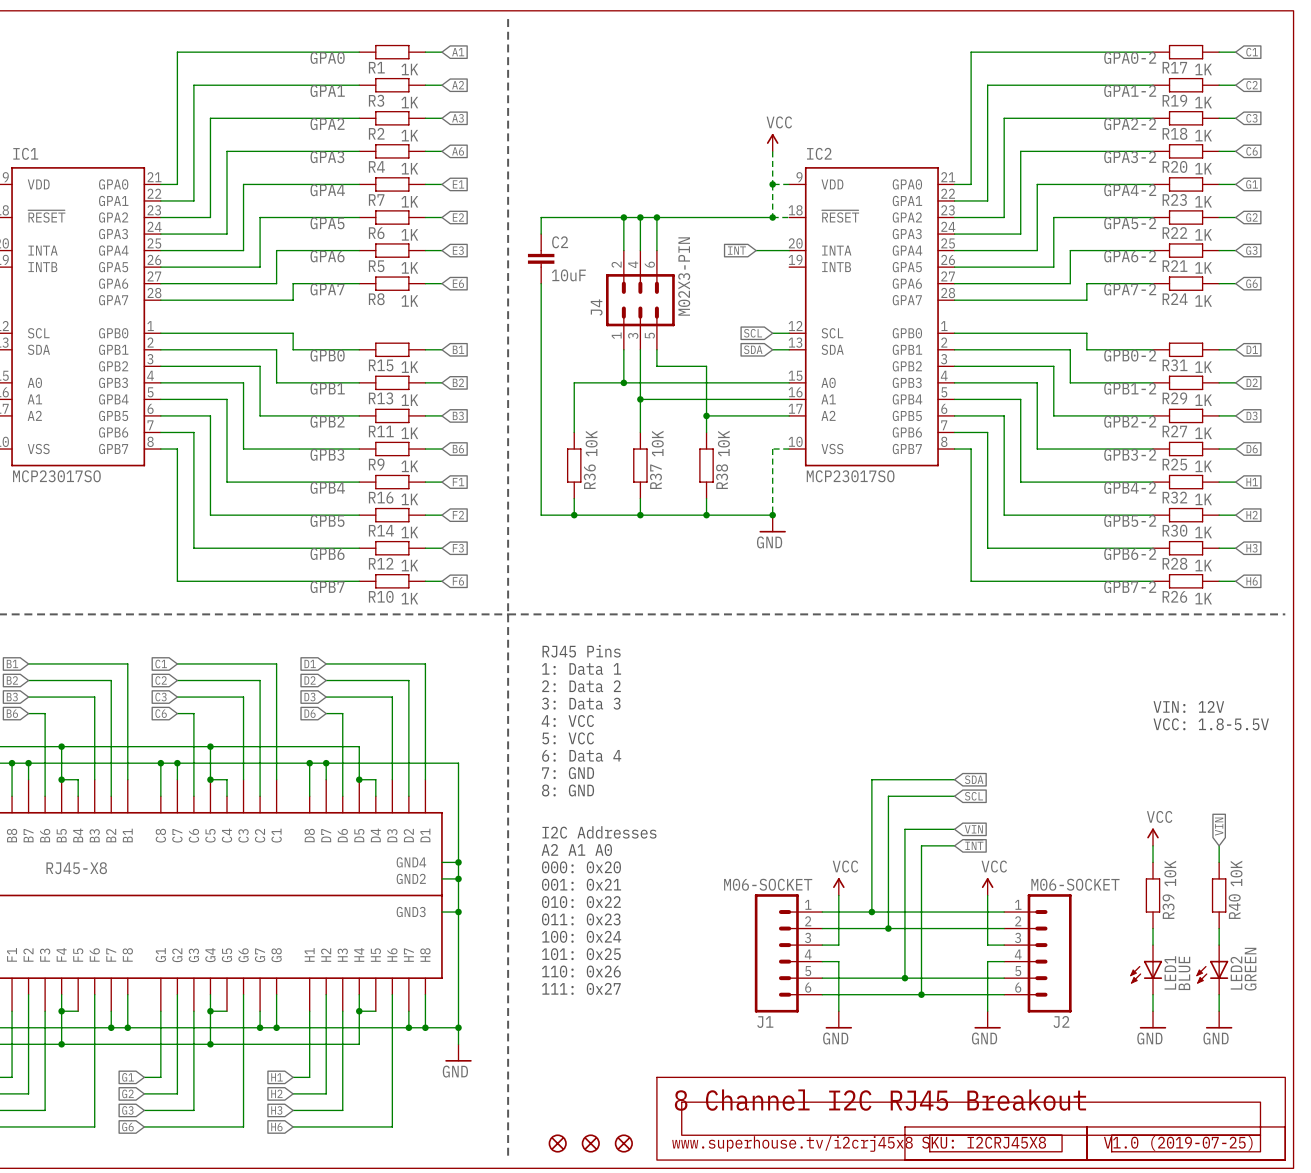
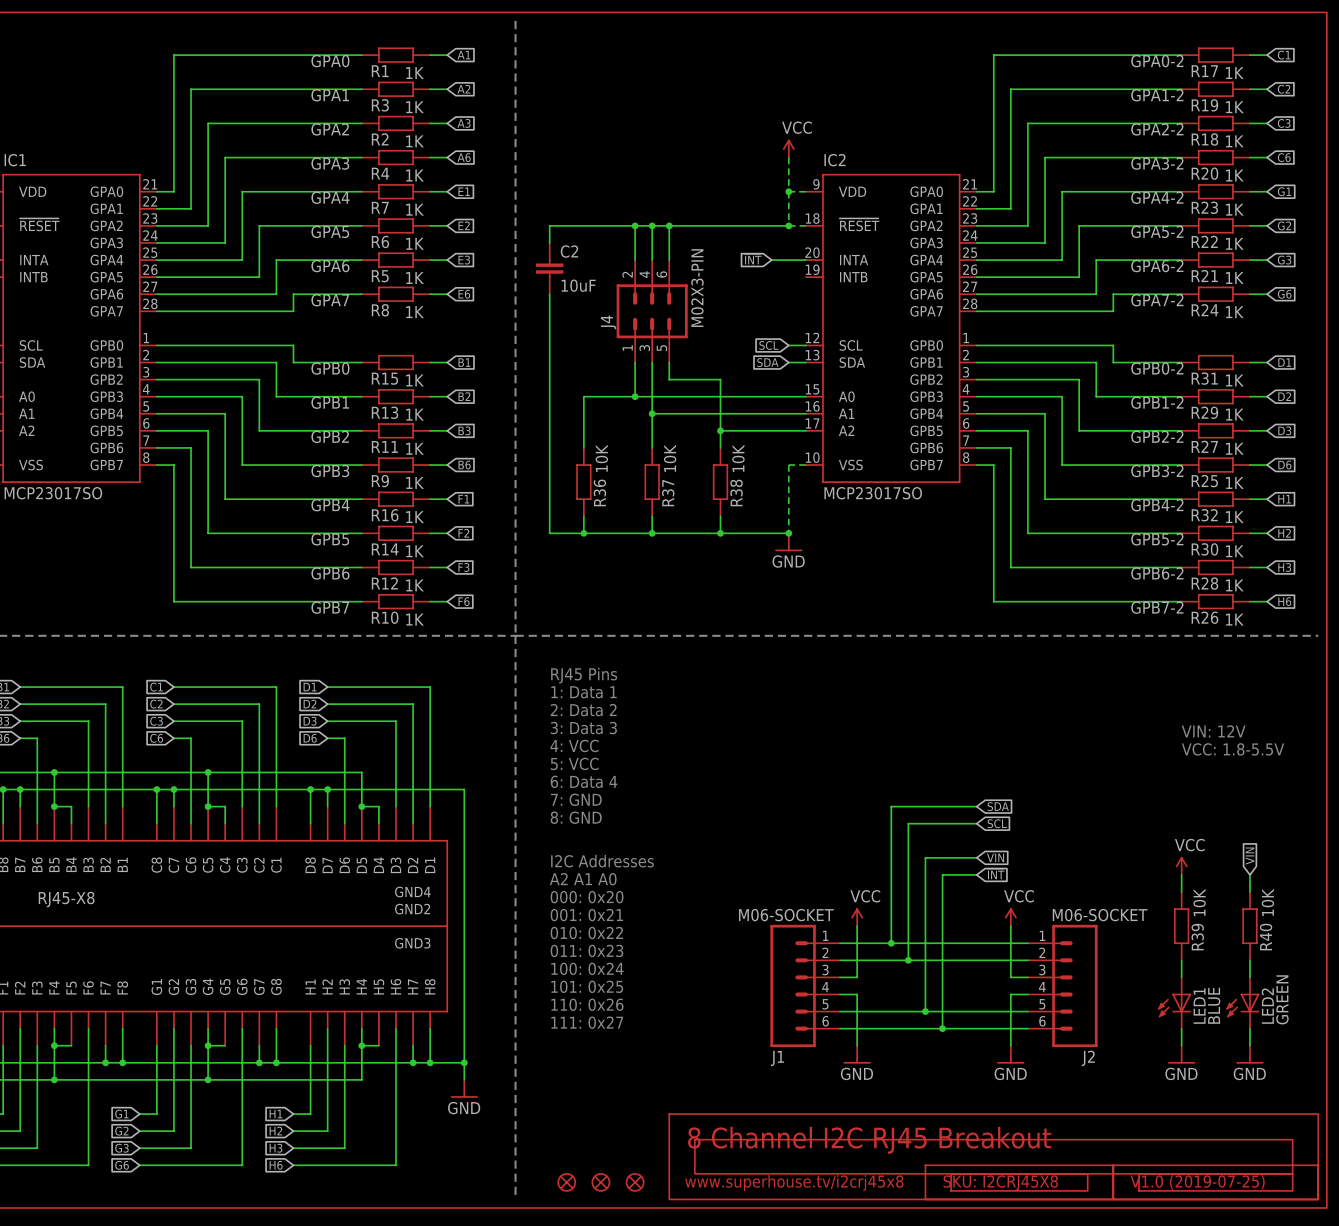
wire: (441, 862) (458, 862) -> none
junction: (458, 862) -> none
wire: (441, 878) (458, 878) -> none
junction: (458, 878) -> none
wire: (441, 912) (458, 912) -> none
junction: (458, 912) -> none

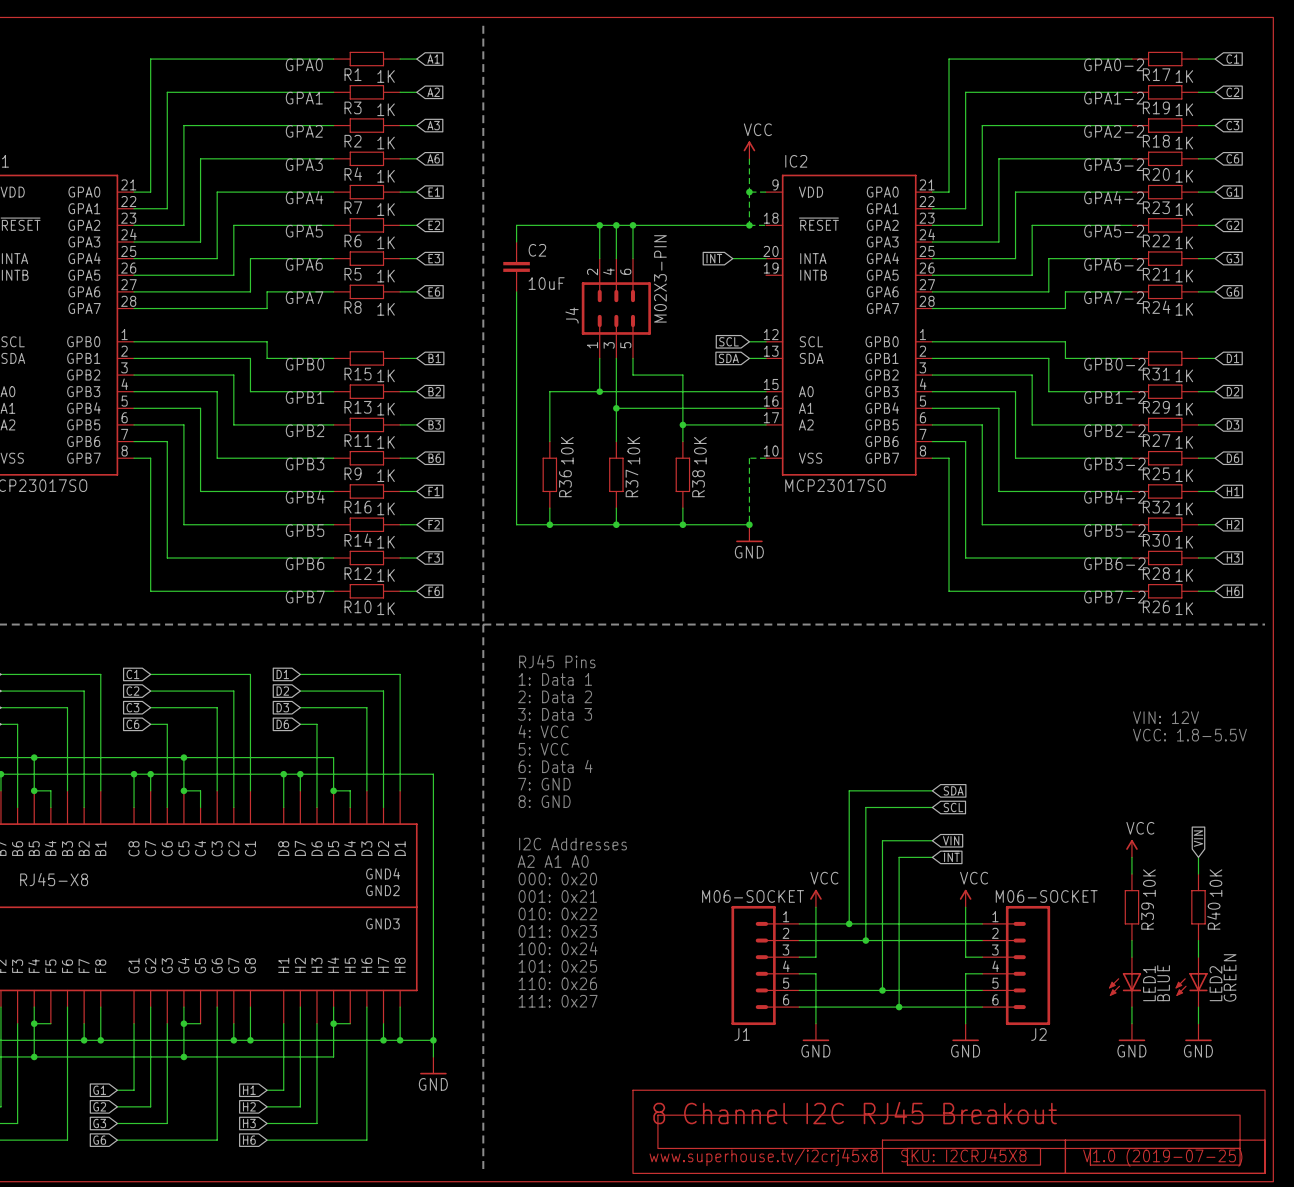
part: (566, 1182) -> none
part: (600, 1182) -> none
part: (635, 1182) -> none

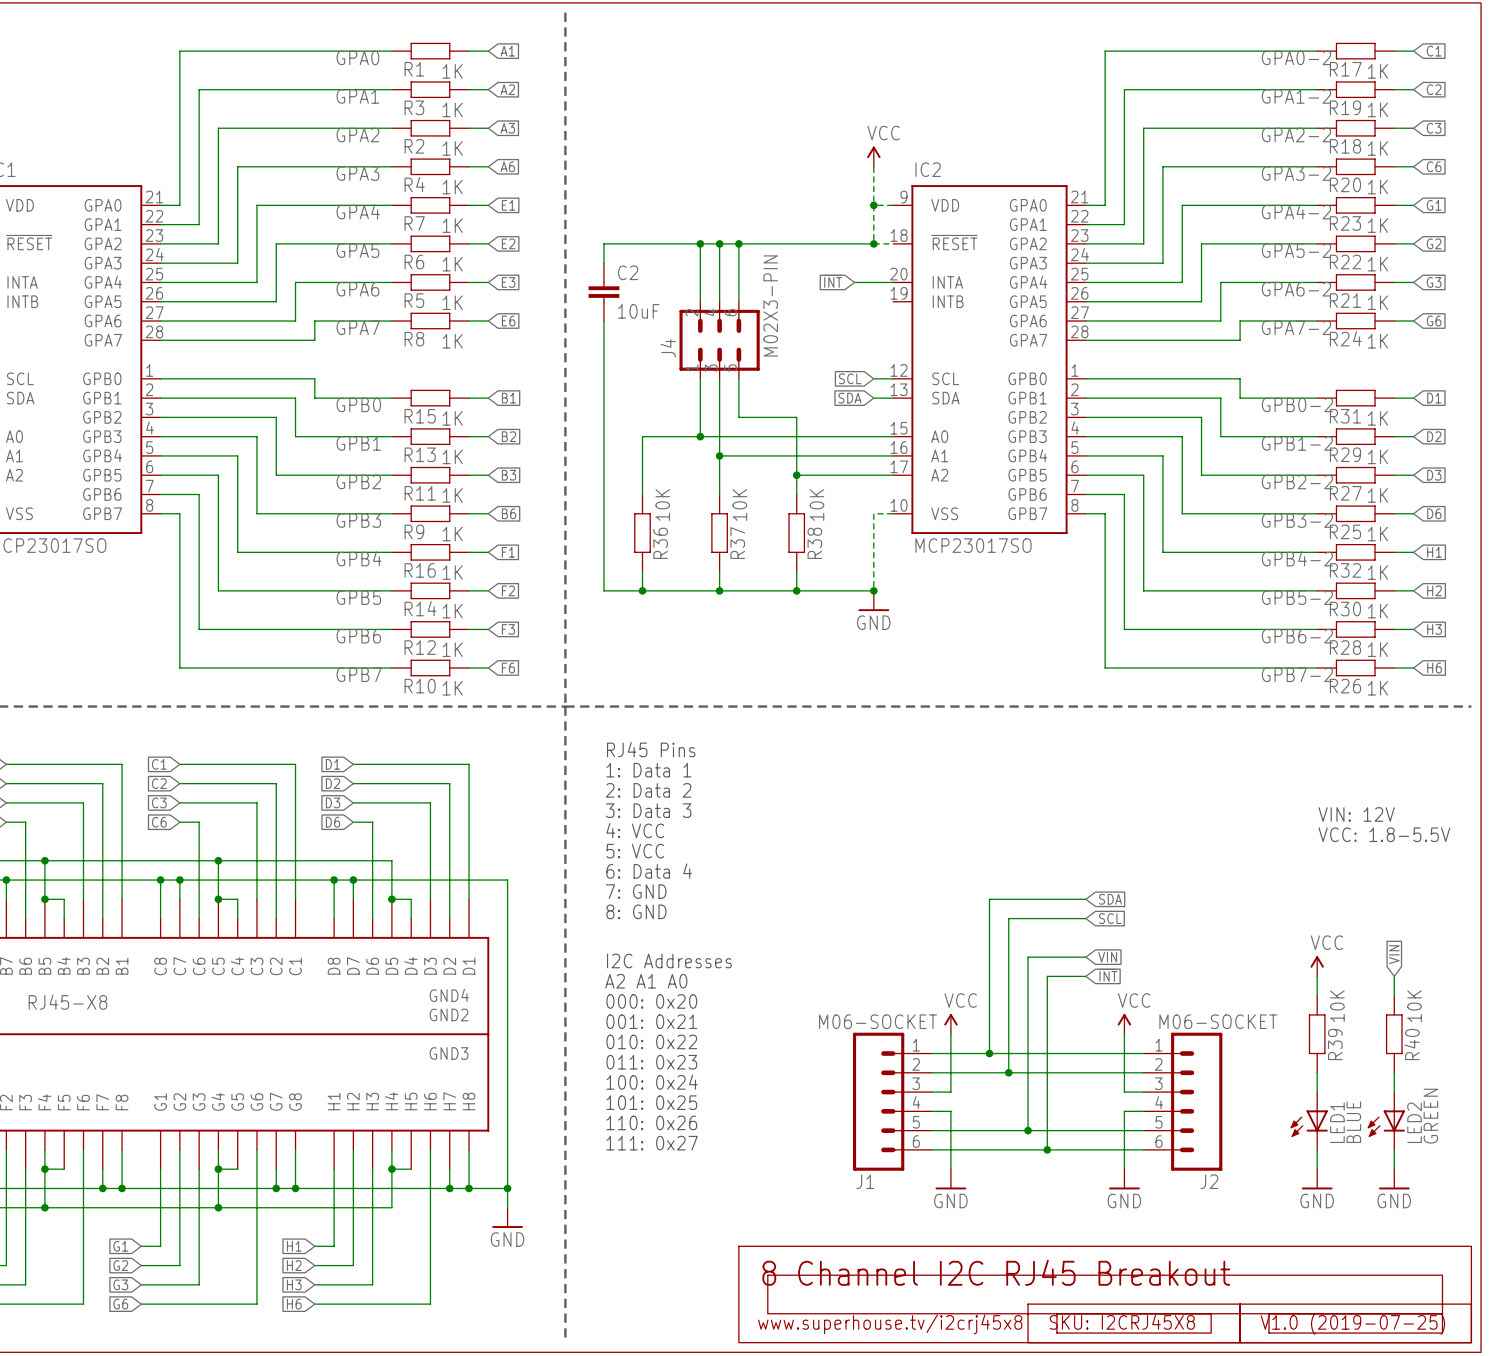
J4 symbol: [581, 258, 651, 359] -> [679, 301, 760, 379]

